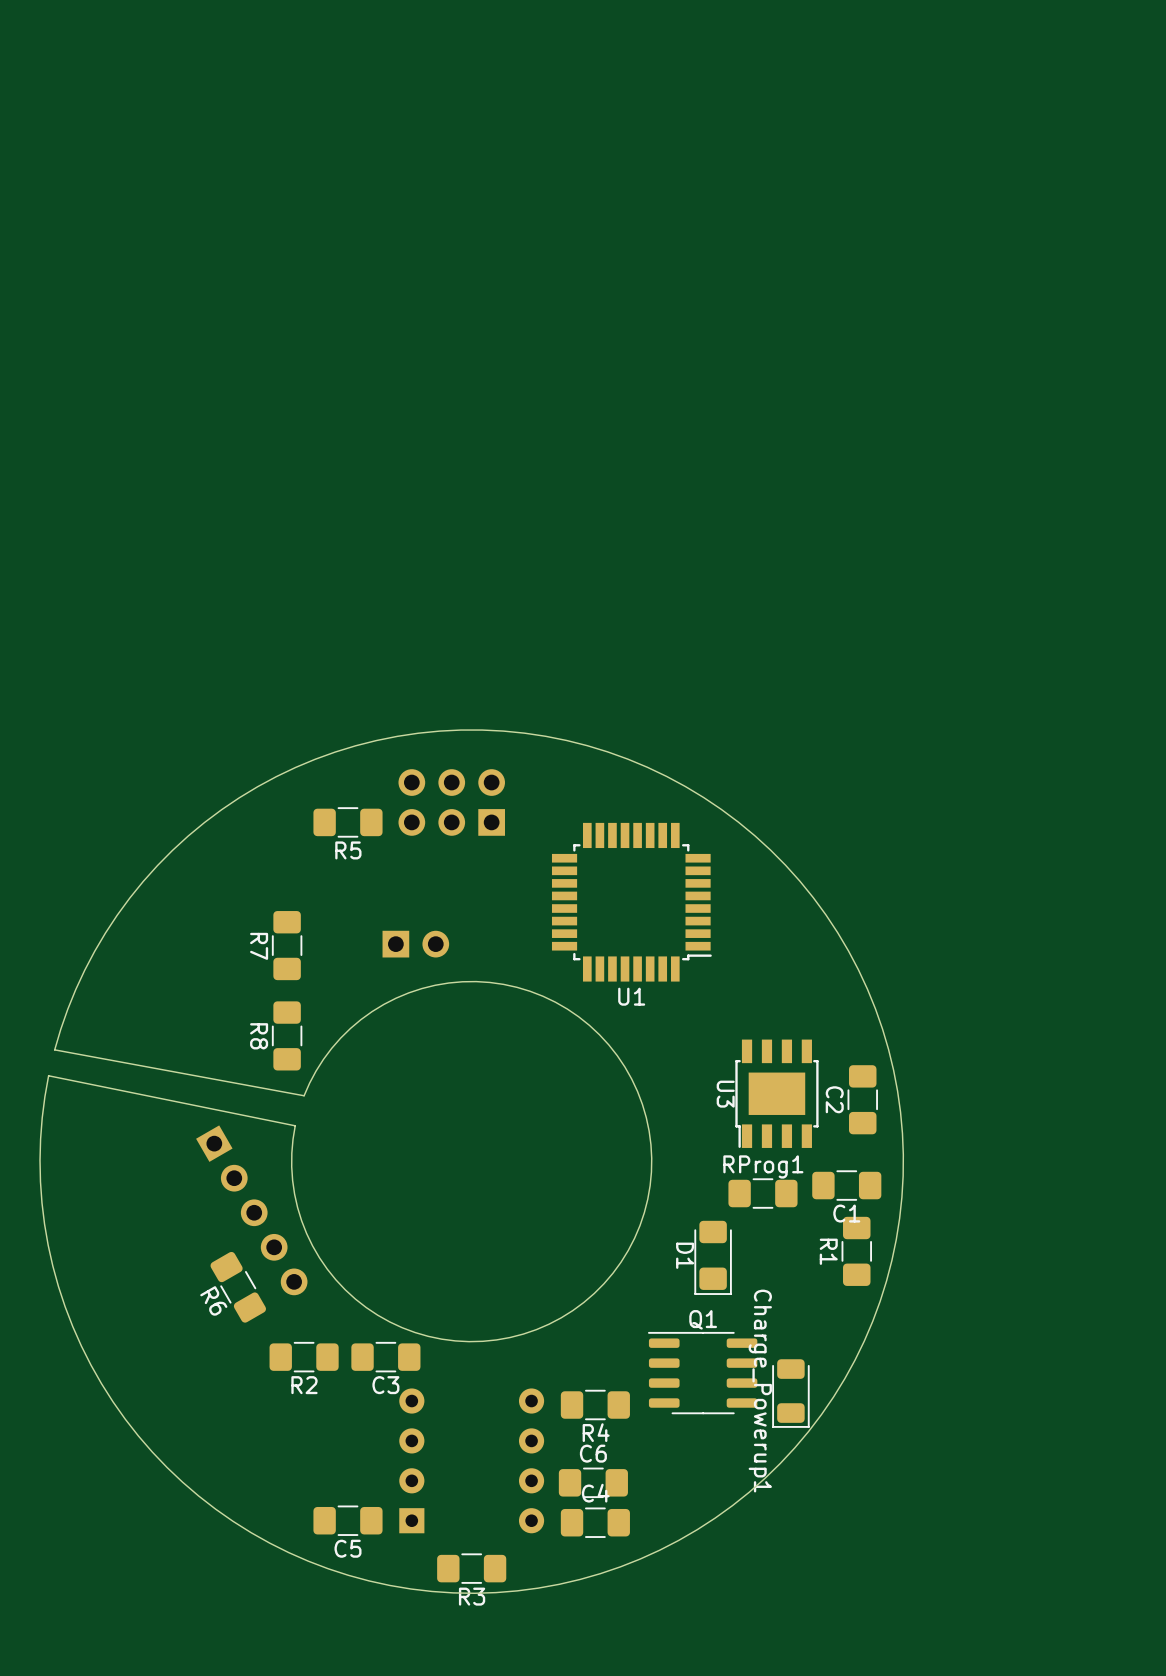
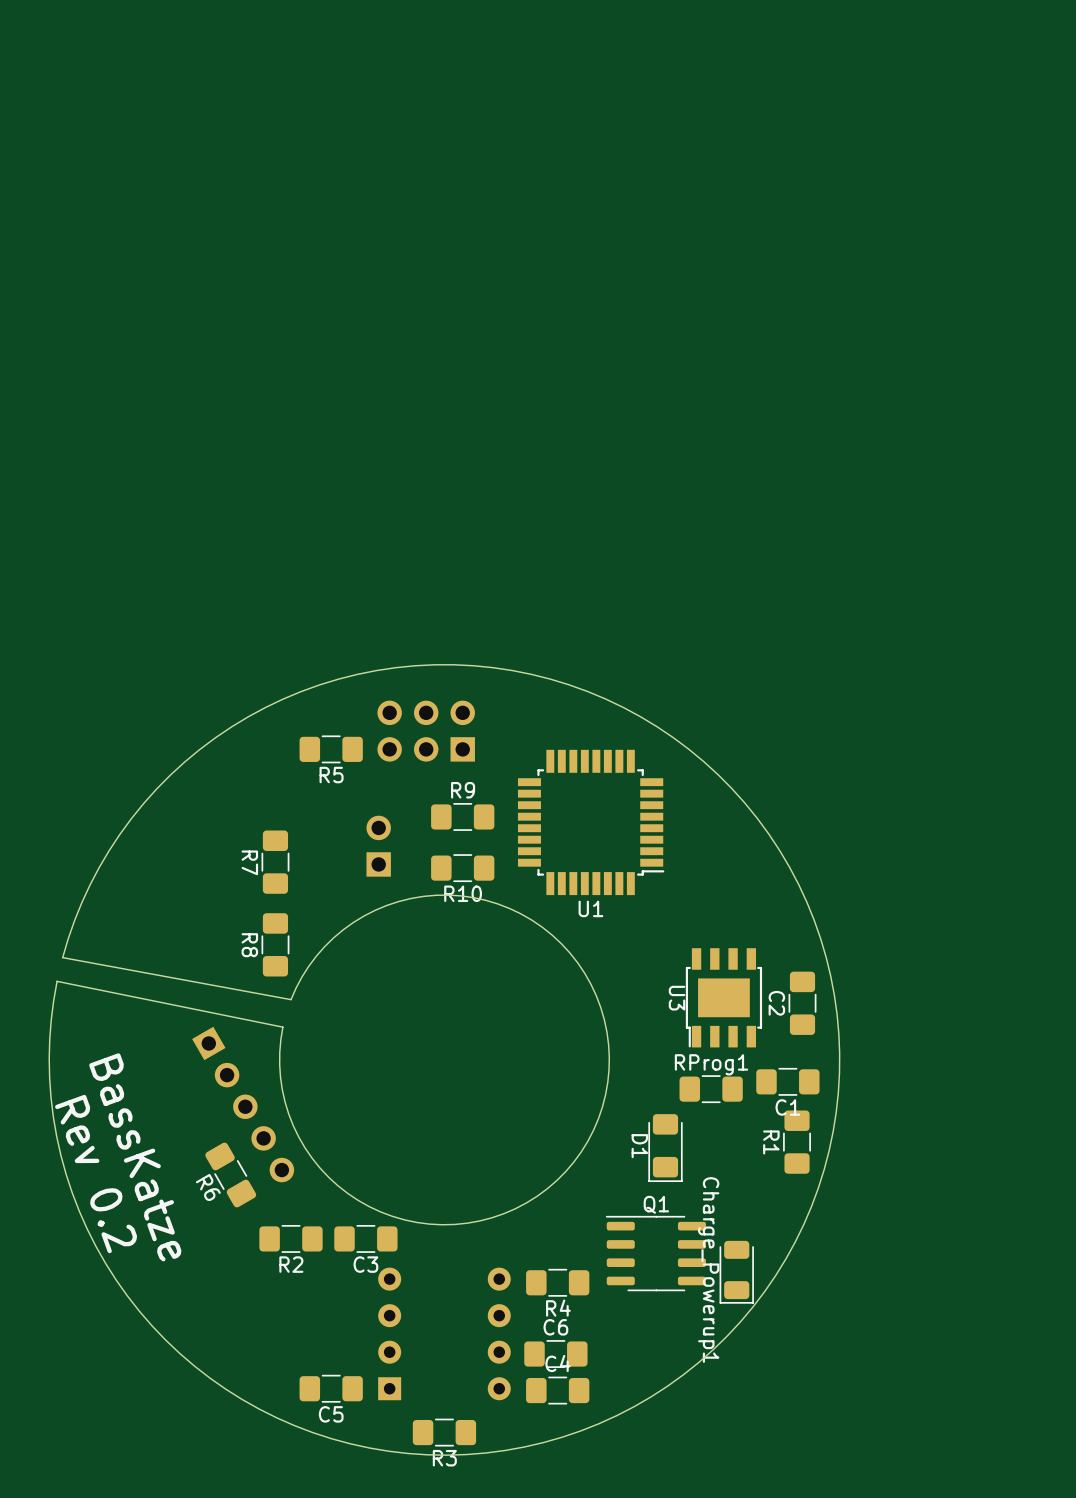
R9: none -> (462, 816)
part rotation: 0° (415, 944) -> 90° counterclockwise (378, 846)
R10: none -> (462, 868)
text: none -> BassKatze (135, 1157)
text: none -> Rev 0.2 (96, 1174)

